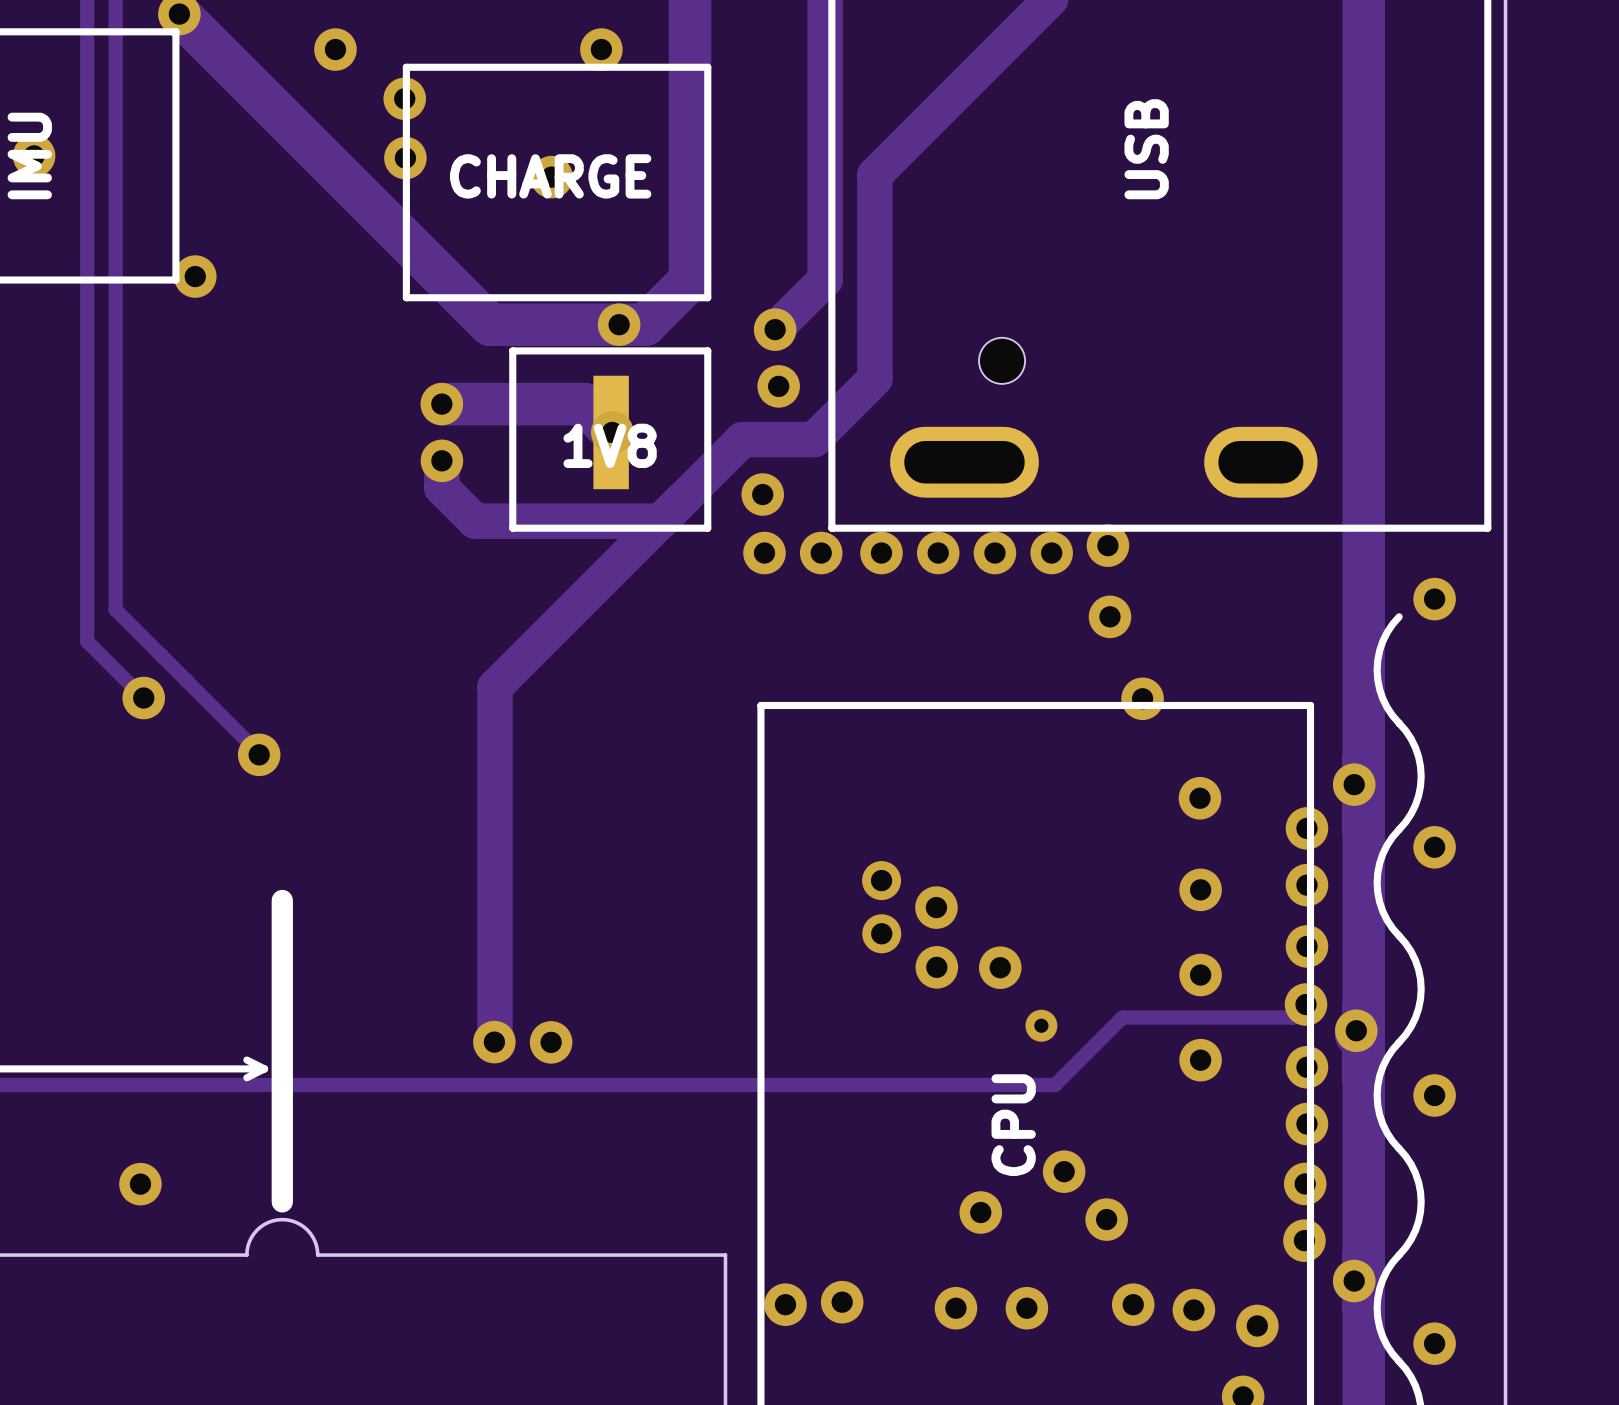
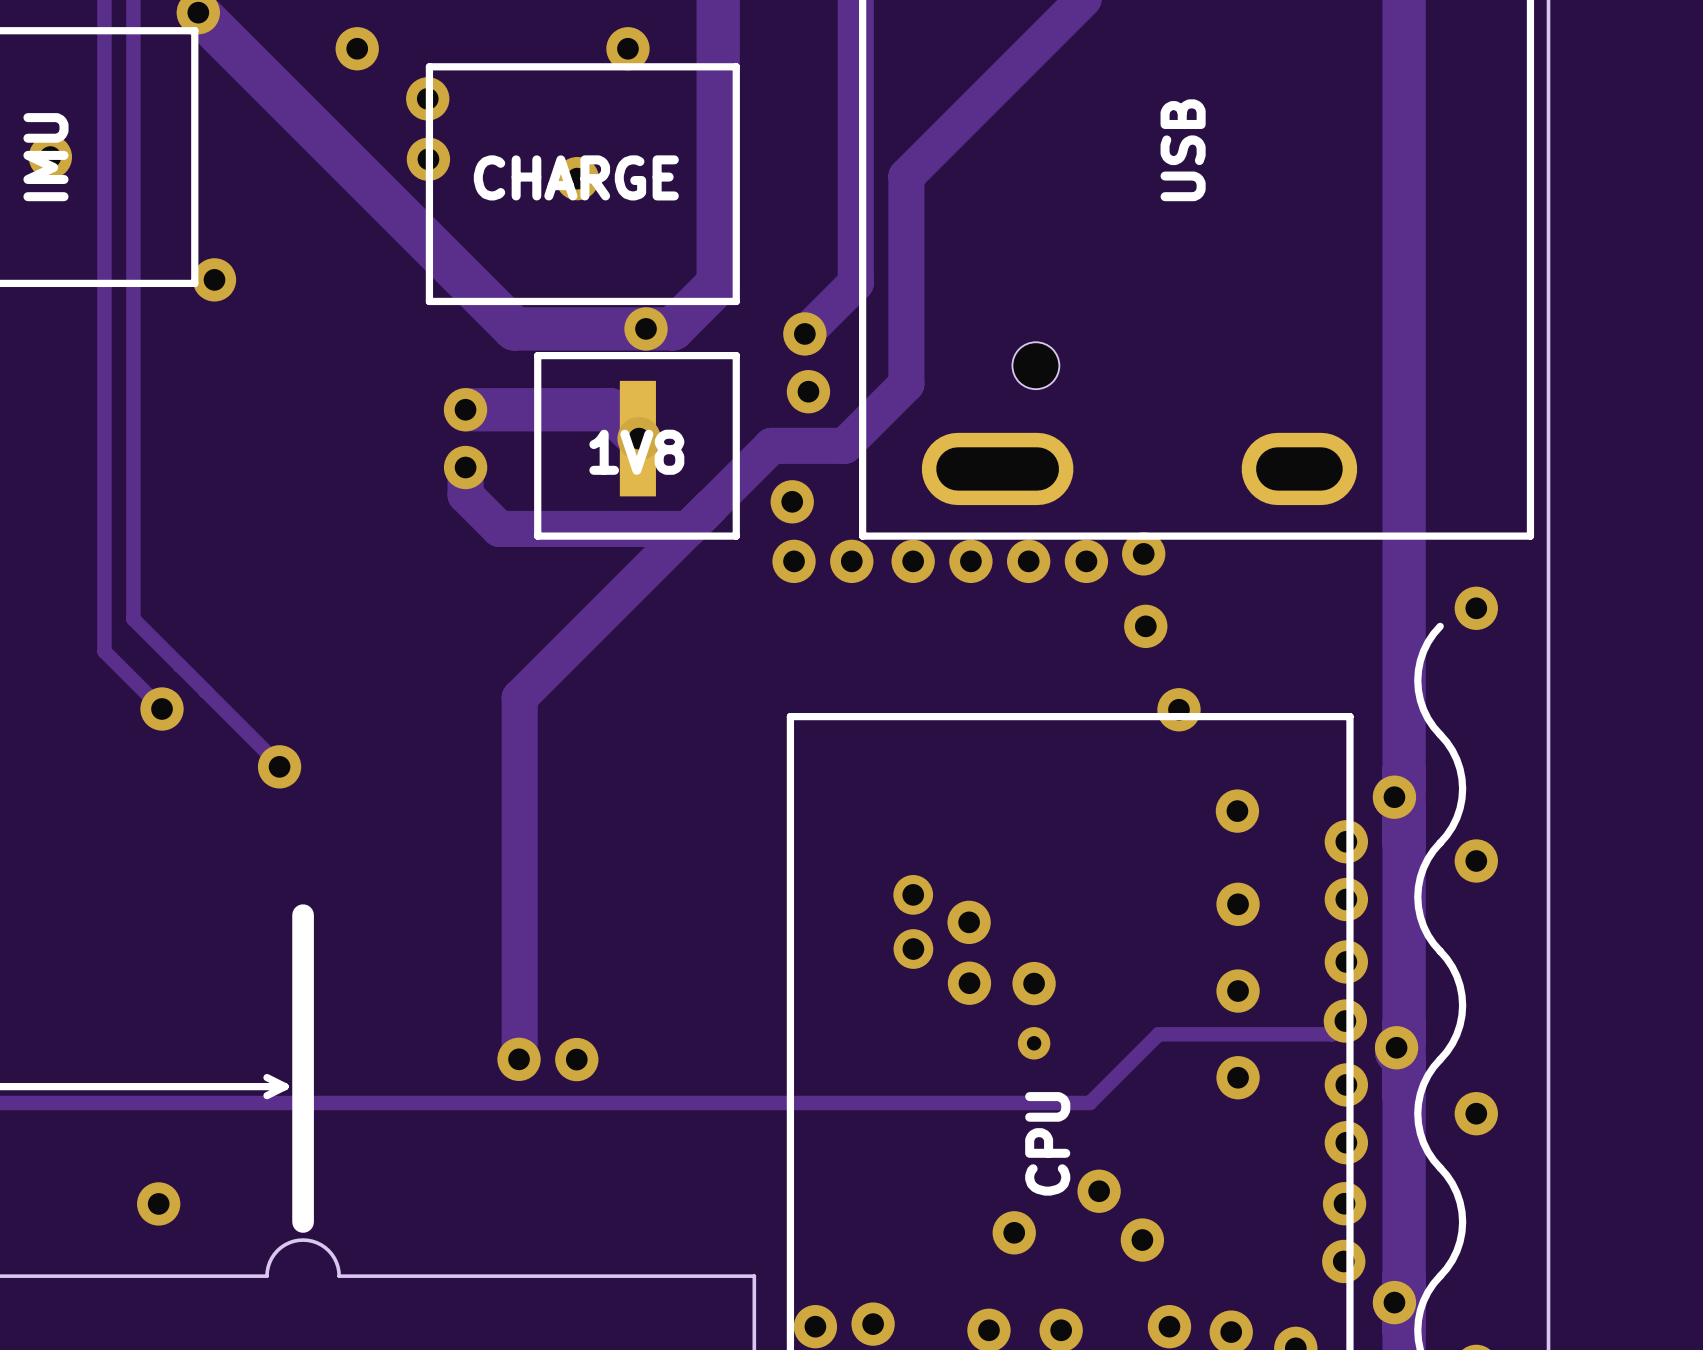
via position: (1041, 1025) -> (1034, 1043)

